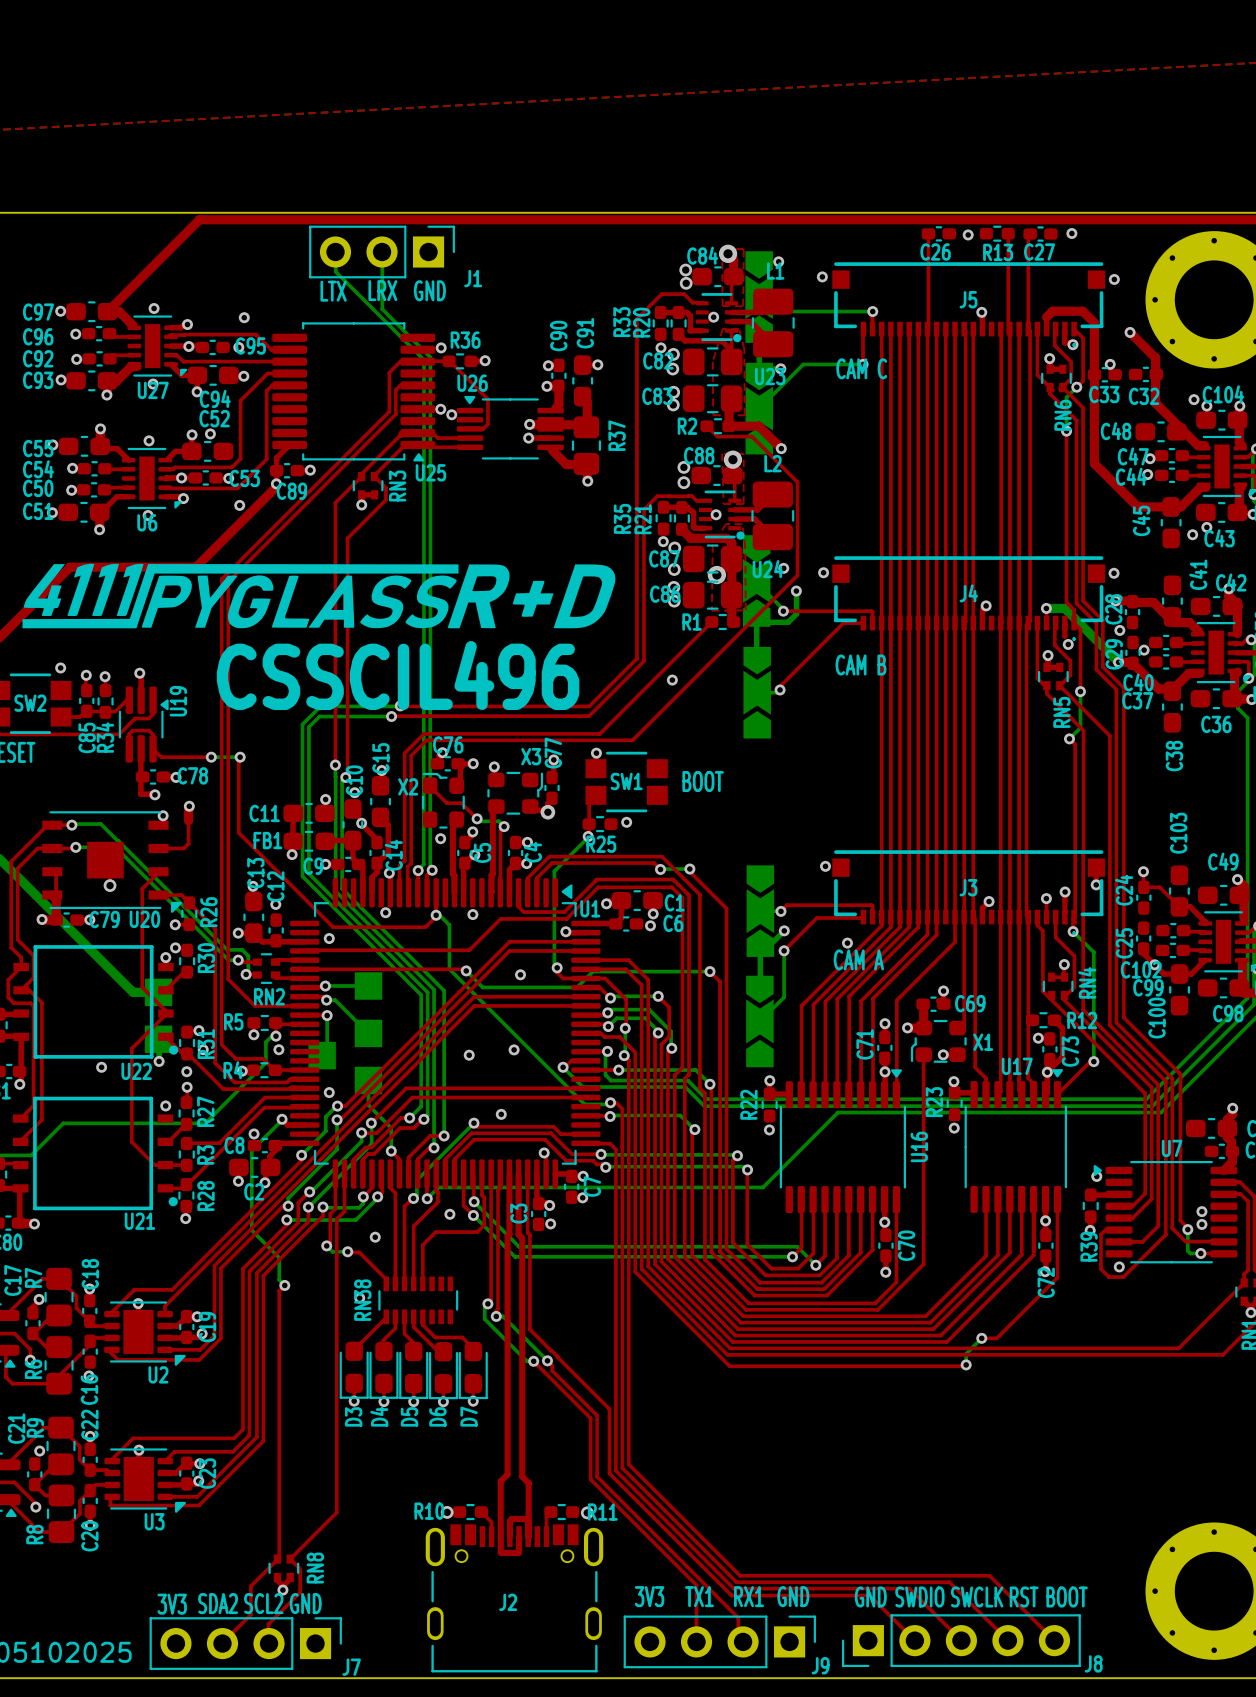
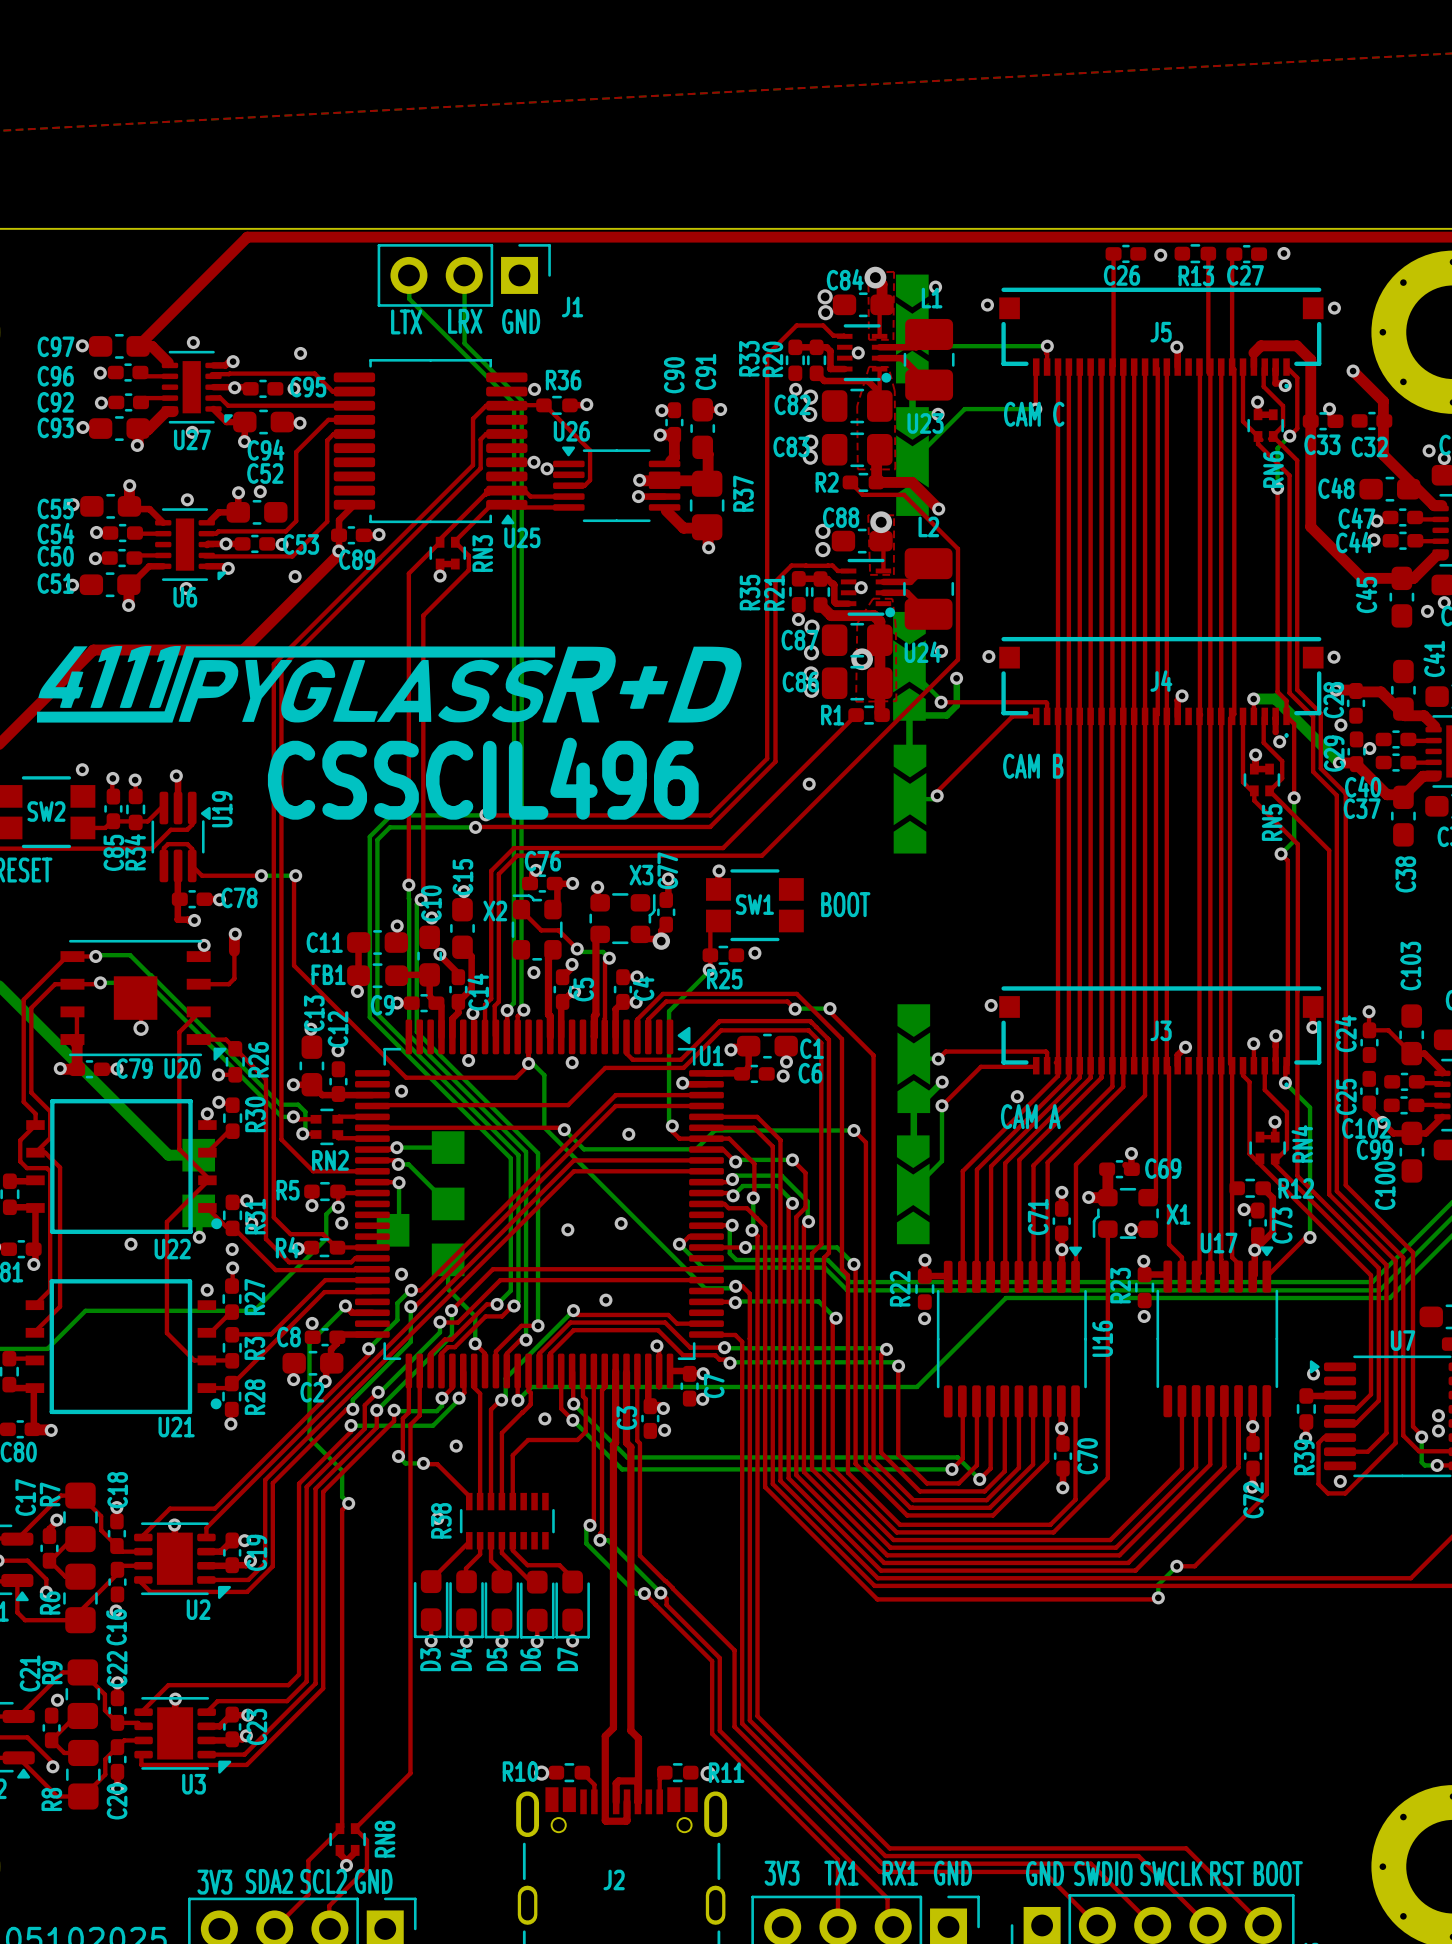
RN38 name: RN38 (362, 1300) -> R38 (441, 1520)

